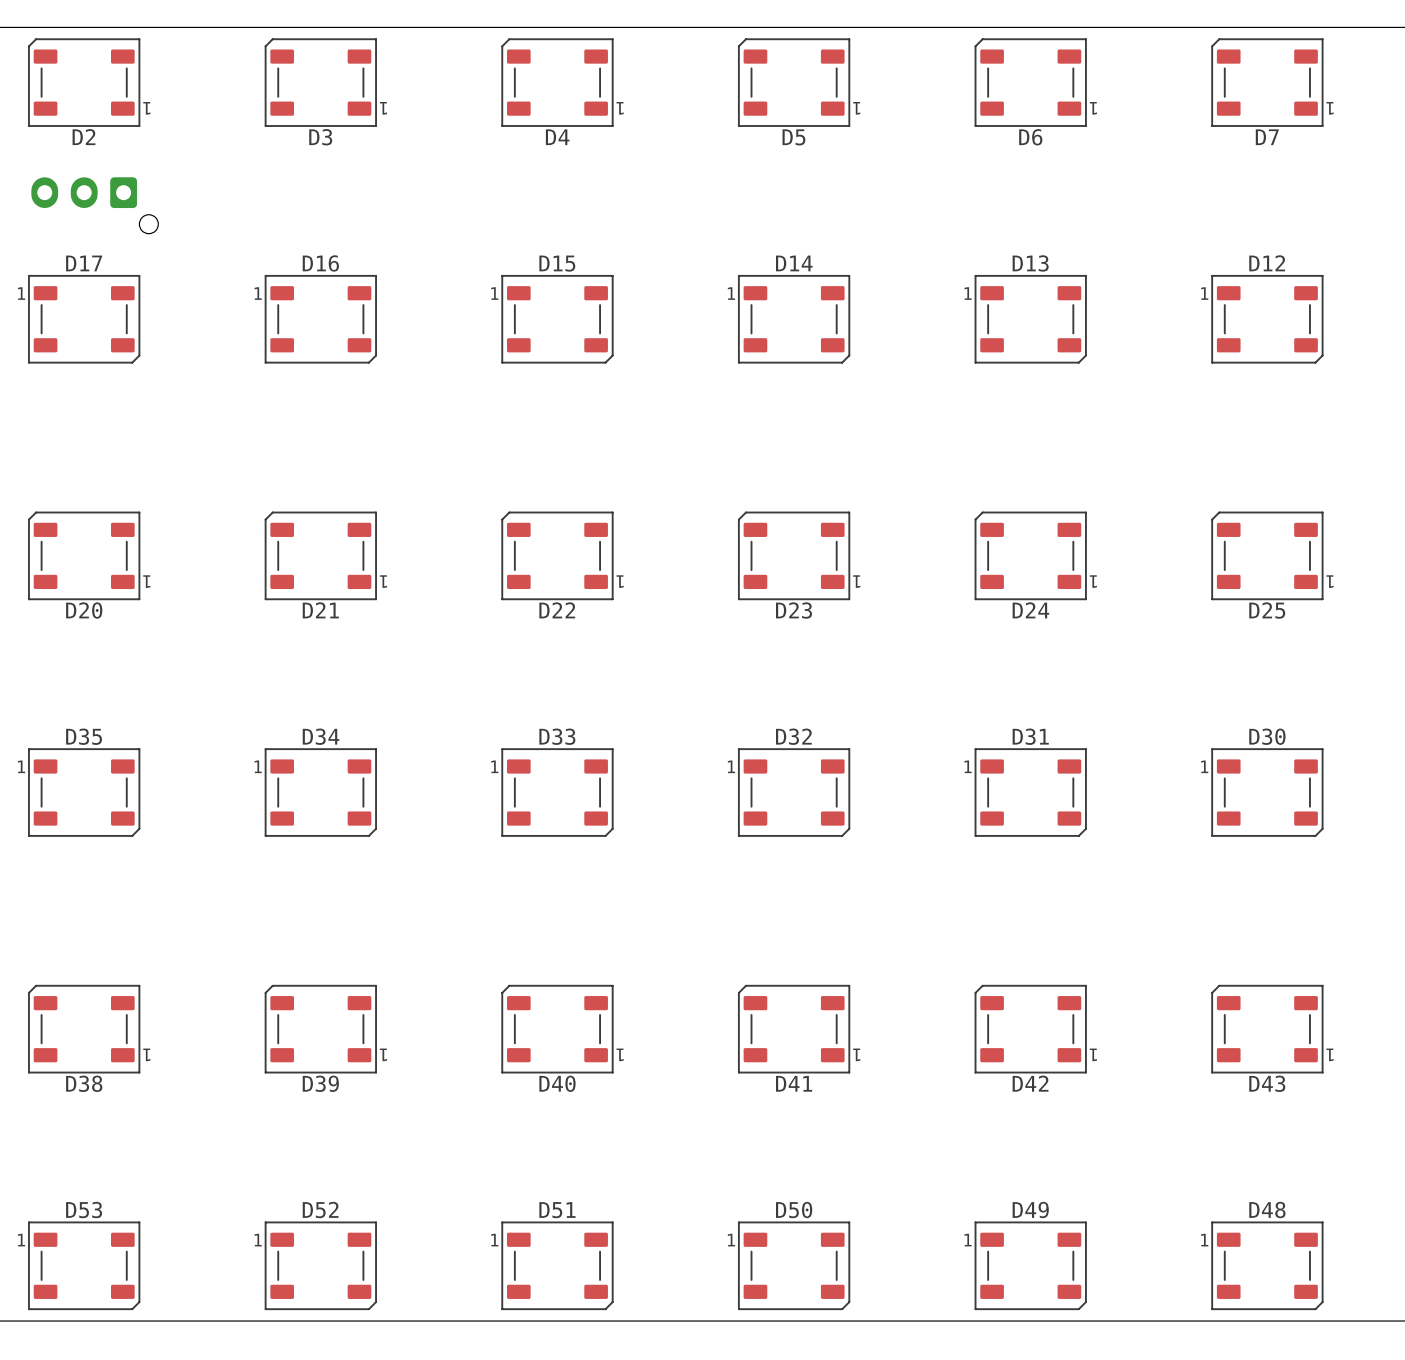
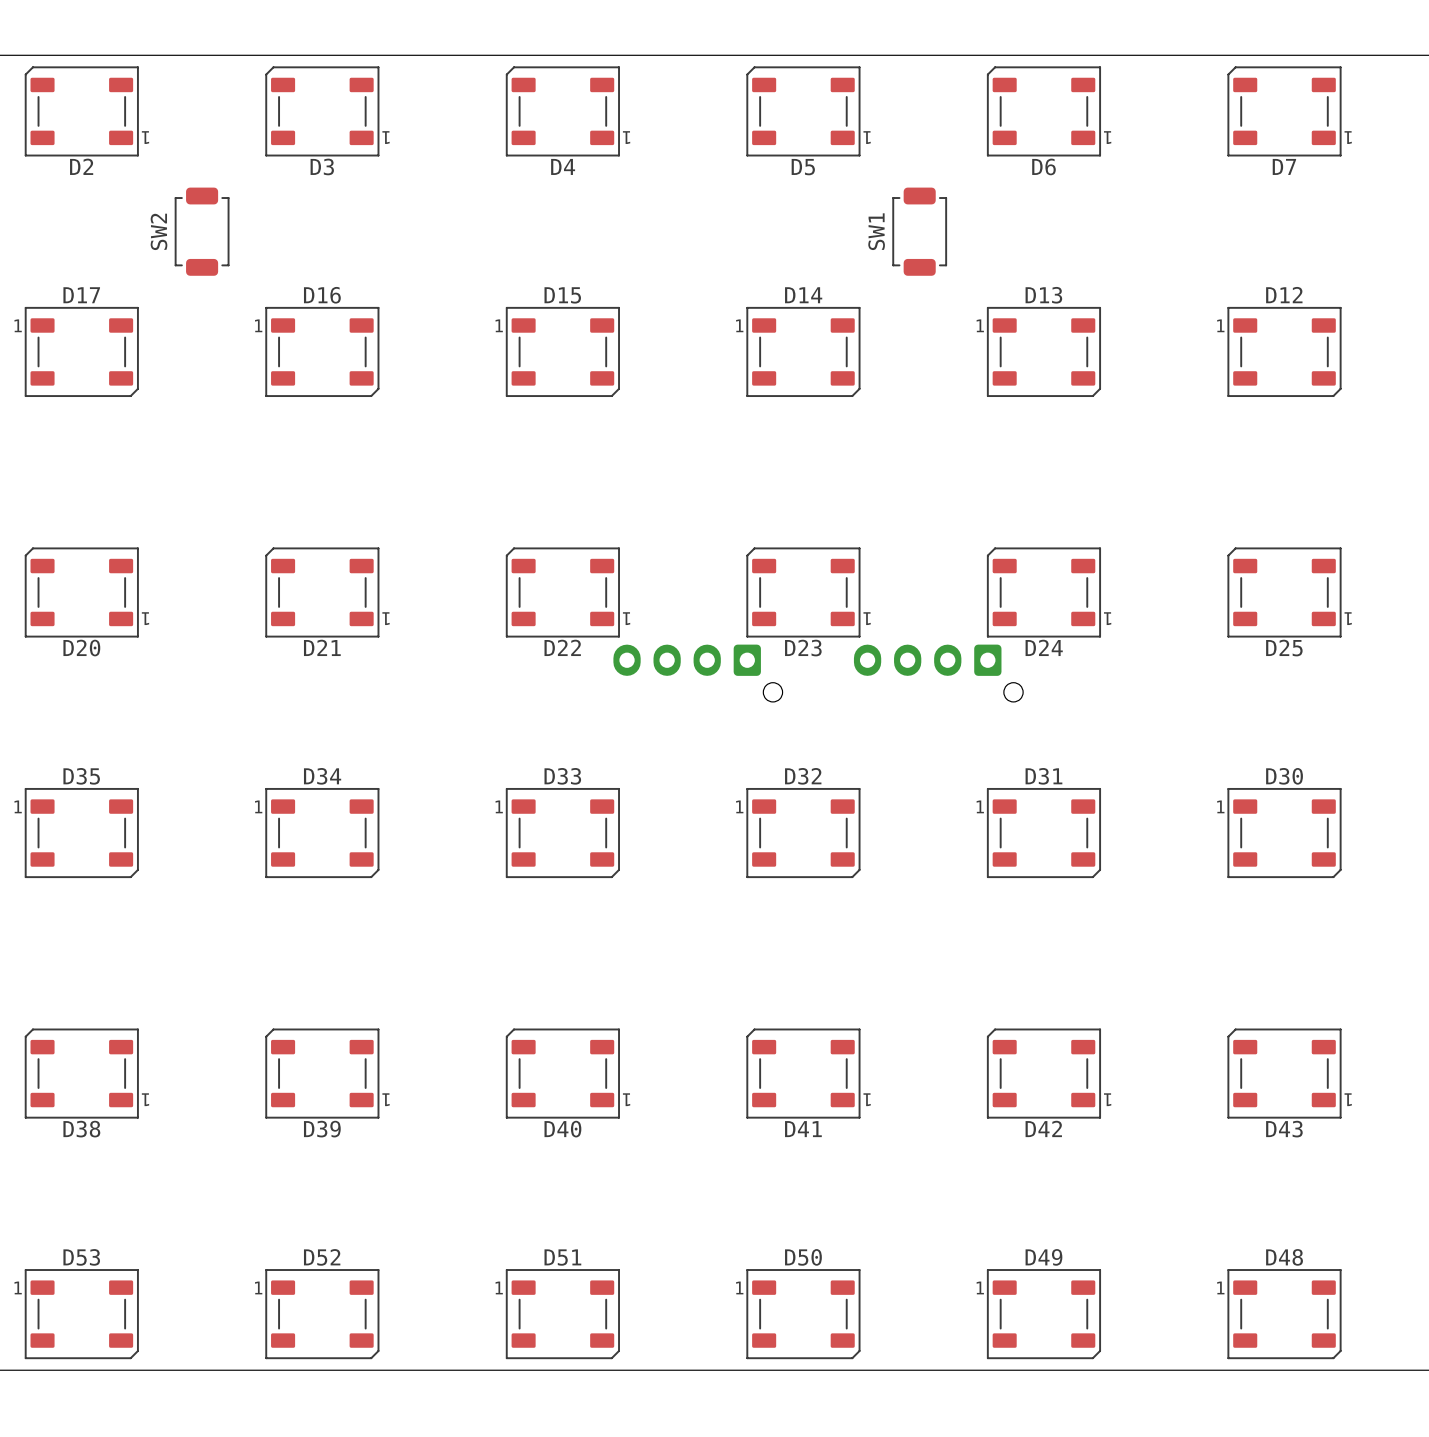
SW2: none -> (202, 231)
SW1: none -> (919, 231)
part: (94, 205) -> none
part: none -> (697, 673)
part: none -> (938, 673)

